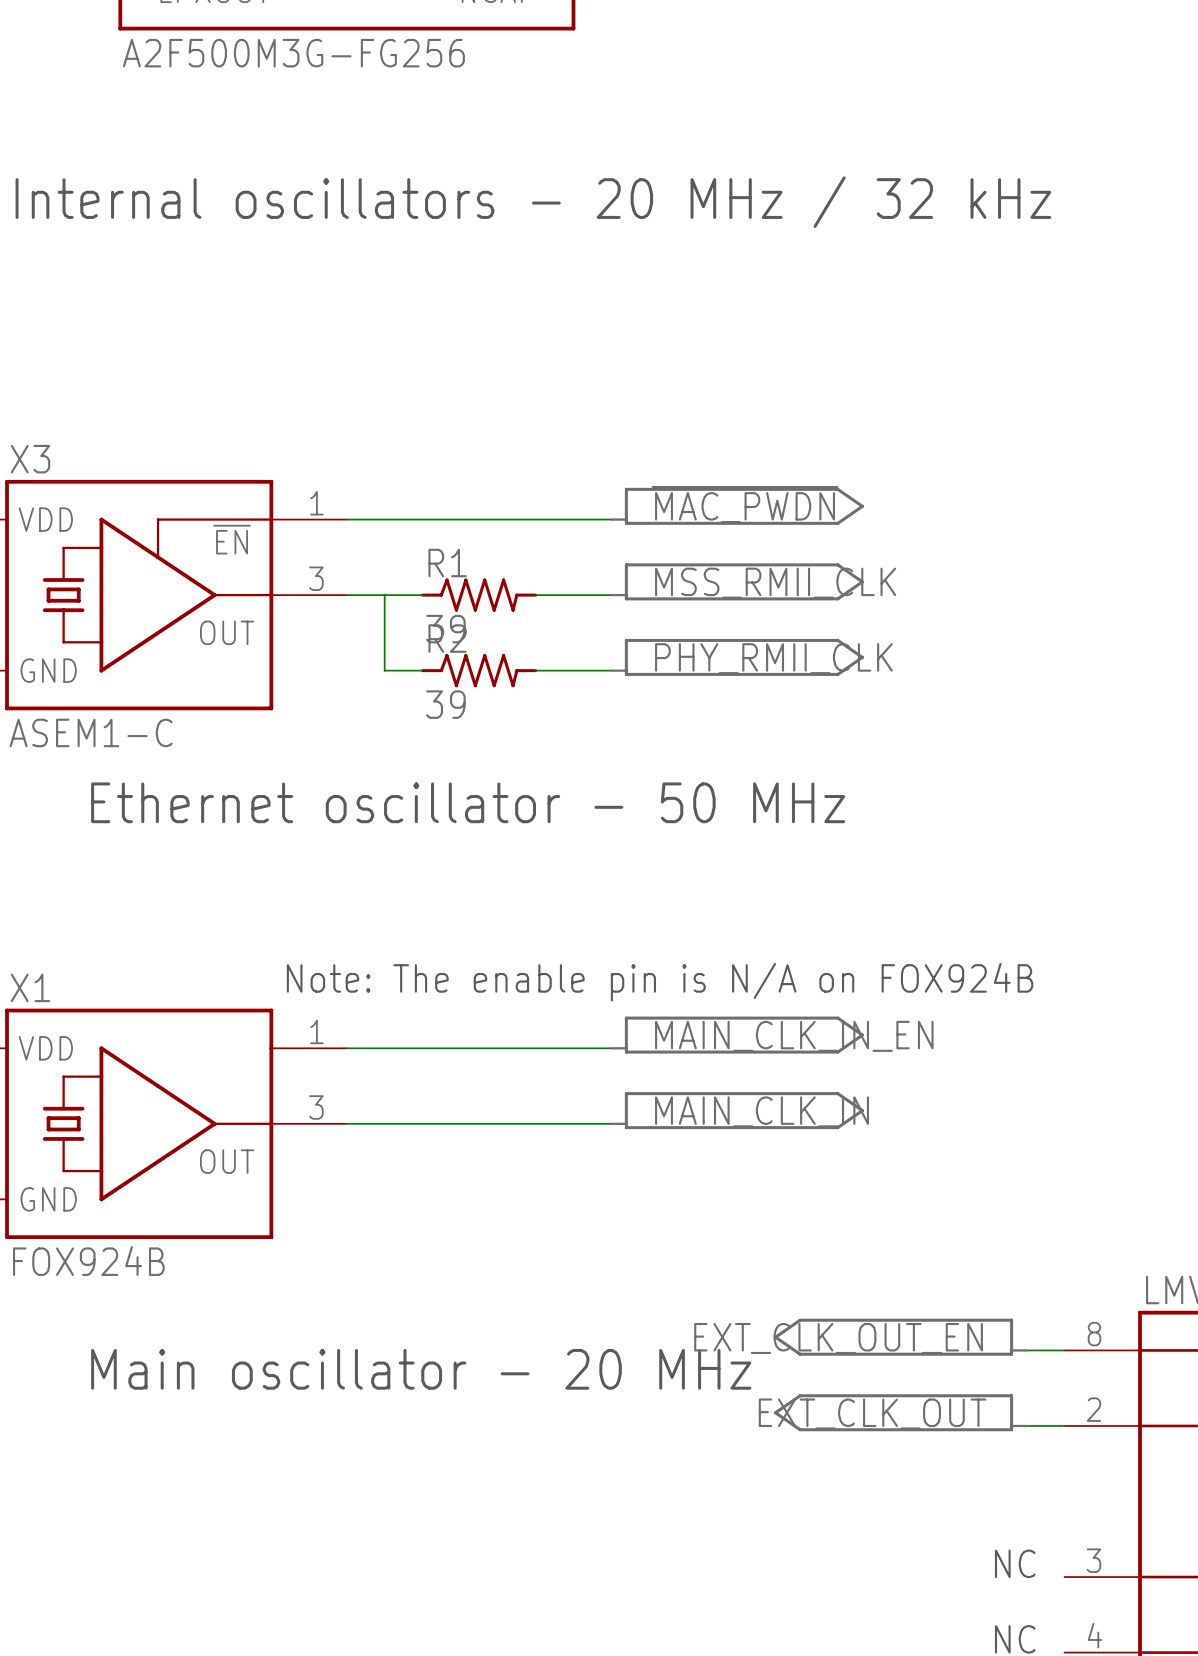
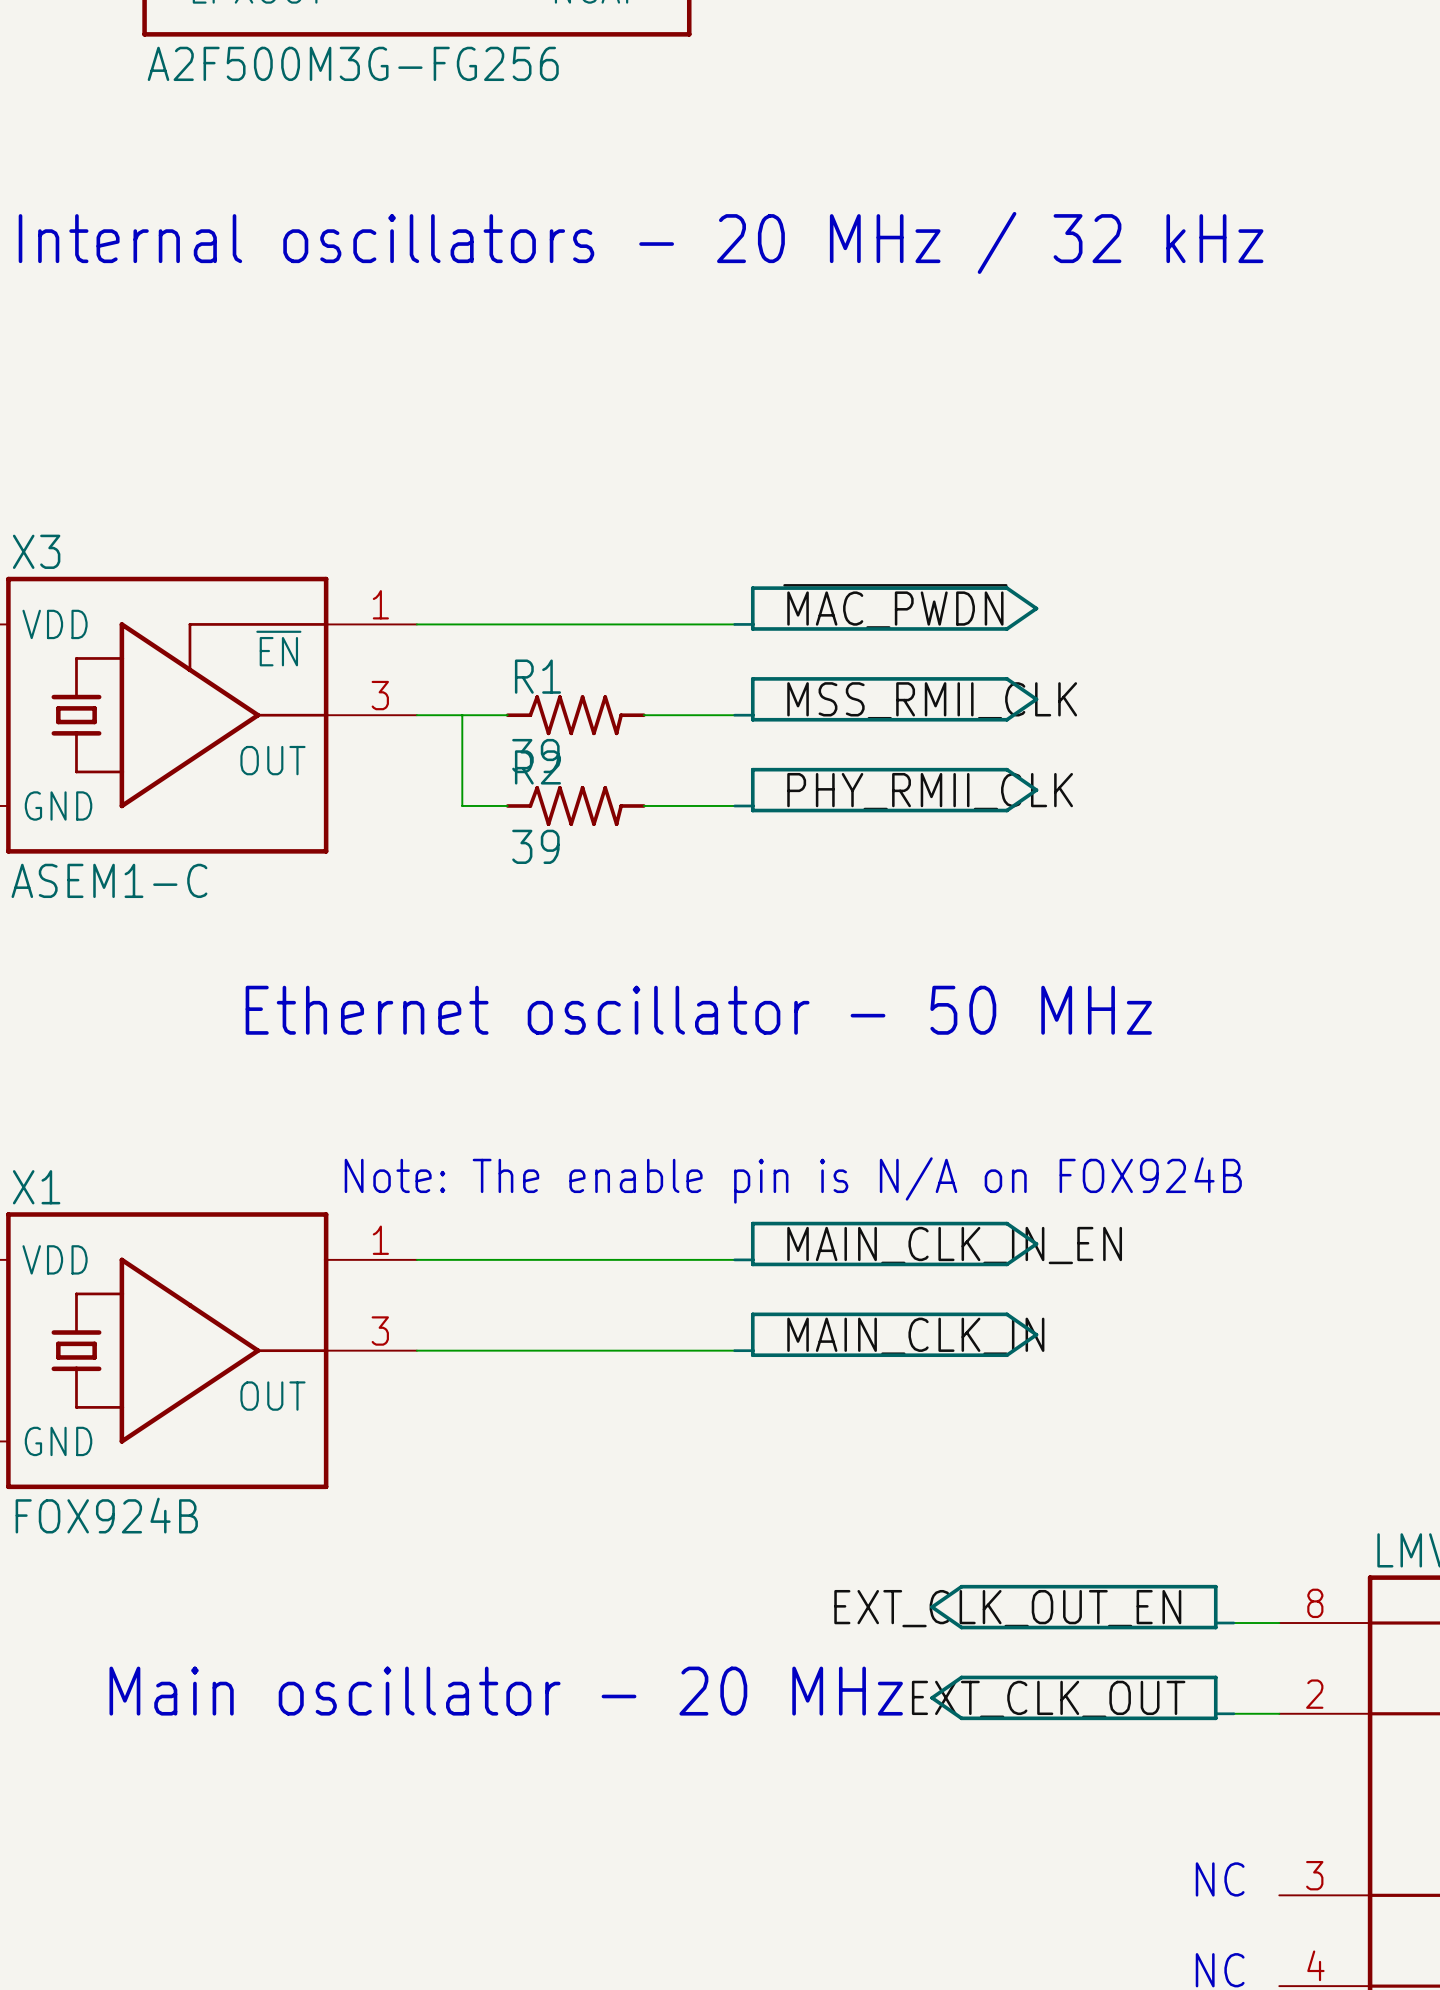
text position: Ethernet oscillator - 50 MHz (468, 802) -> Ethernet oscillator - 50 MHz (698, 1010)
text position: Main oscillator - 20 MHz (421, 1369) -> Main oscillator - 20 MHz (506, 1691)

